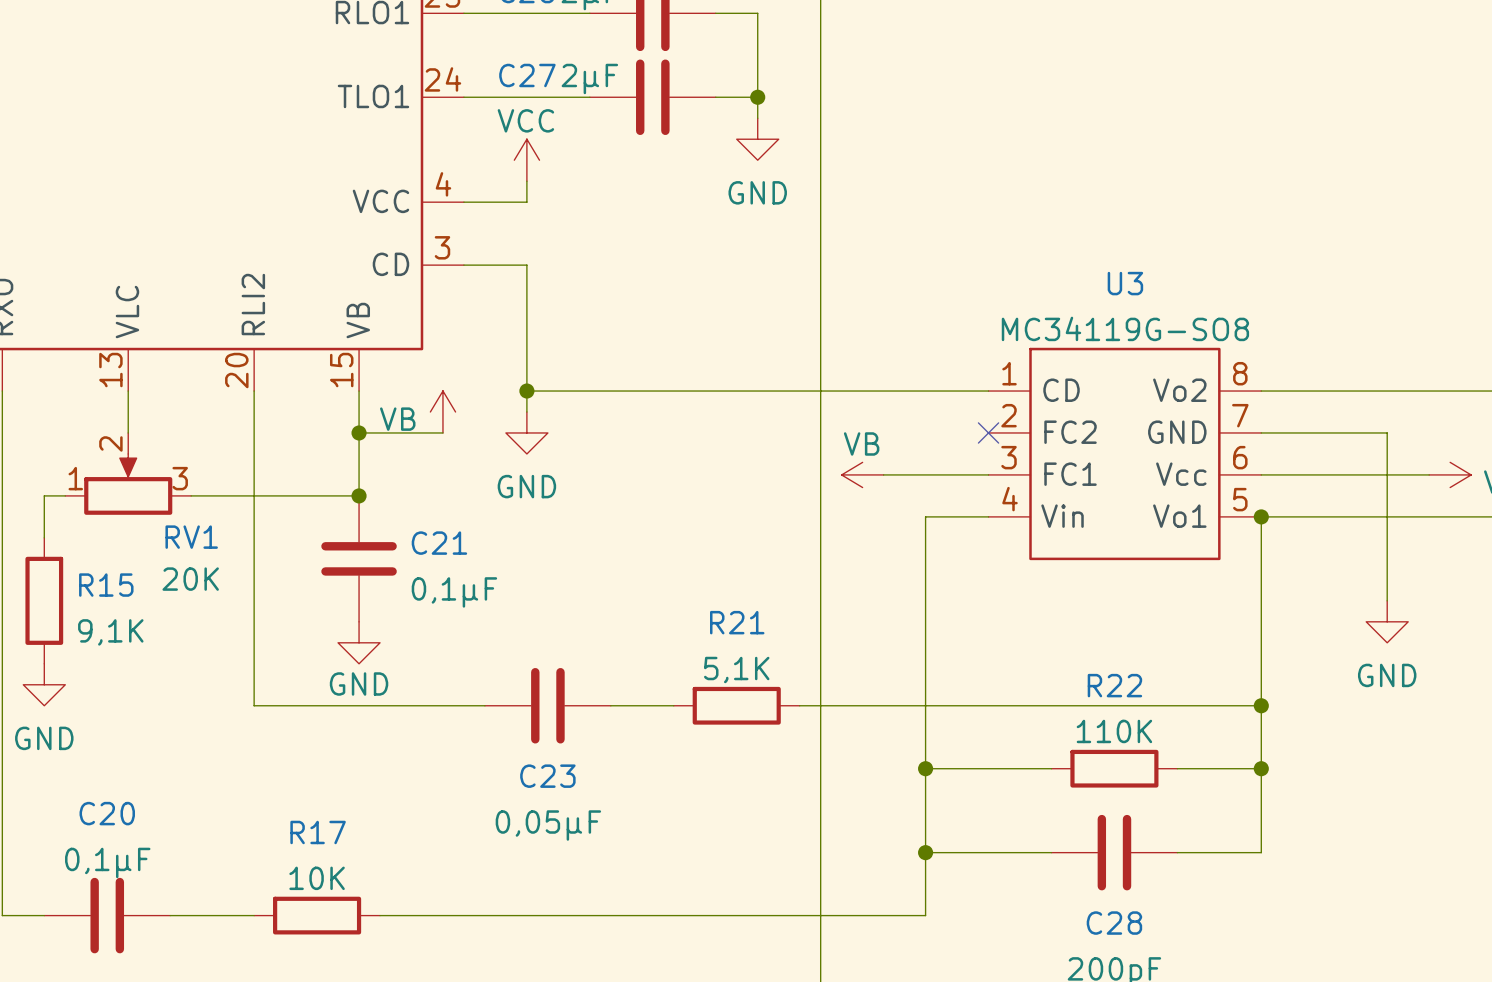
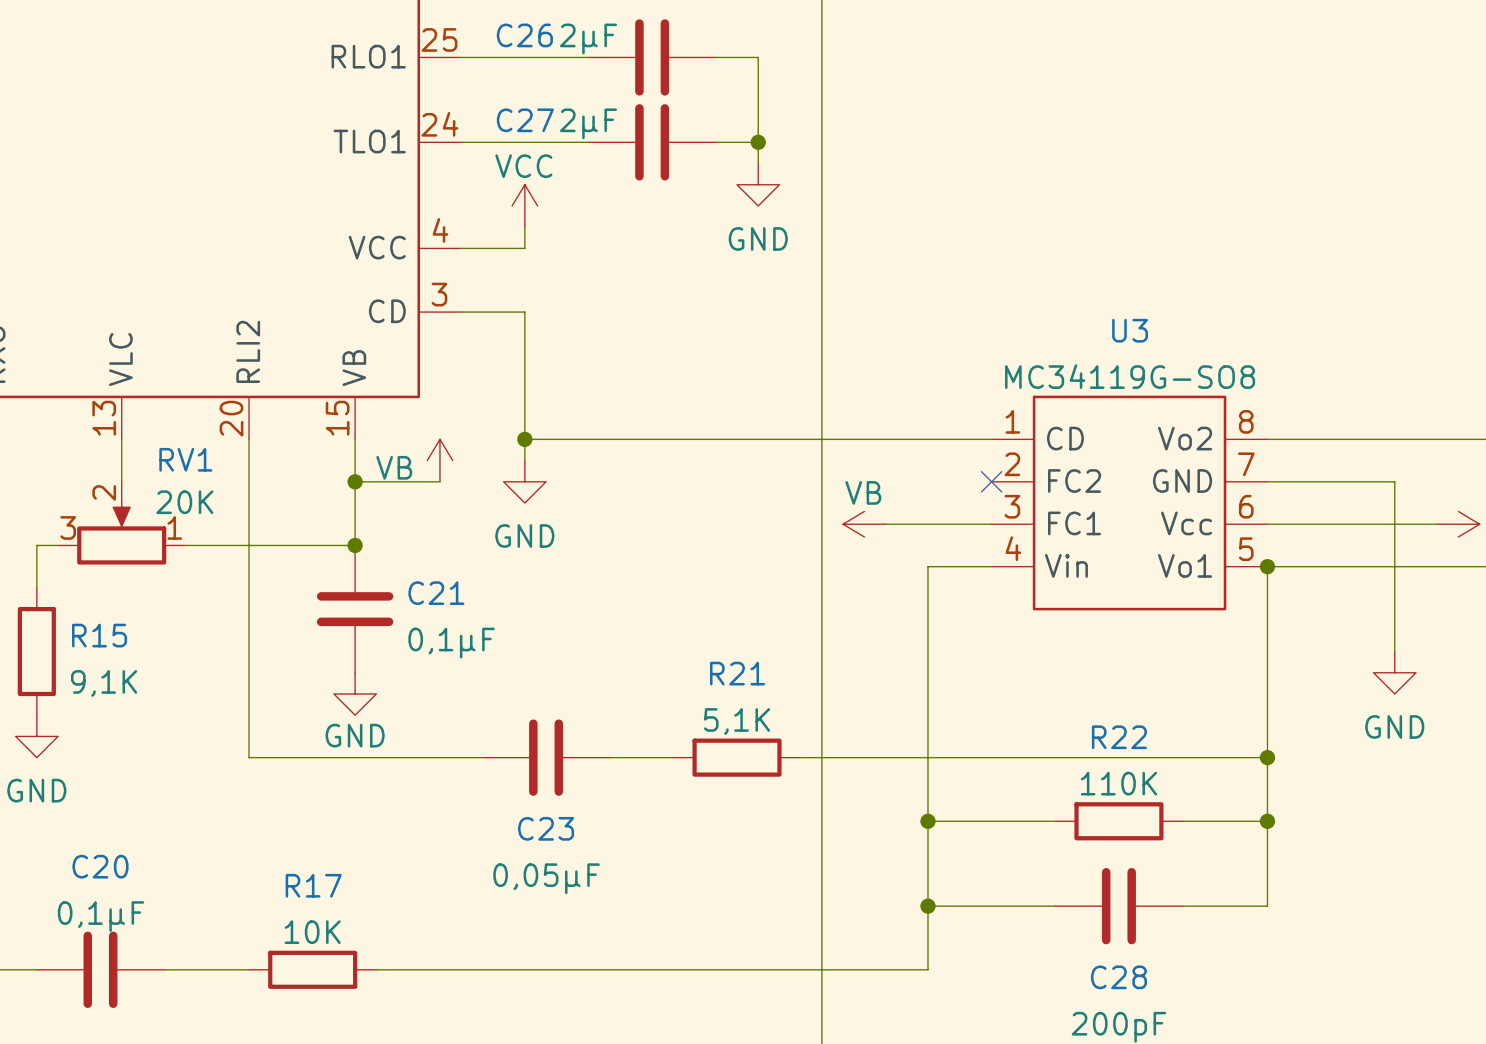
RV1 flip: as is (128, 484) -> left-right (121, 533)
RV1 name position: RV1 (191, 537) -> RV1 (185, 459)
RV1 value position: 20K (190, 579) -> 20K (184, 502)

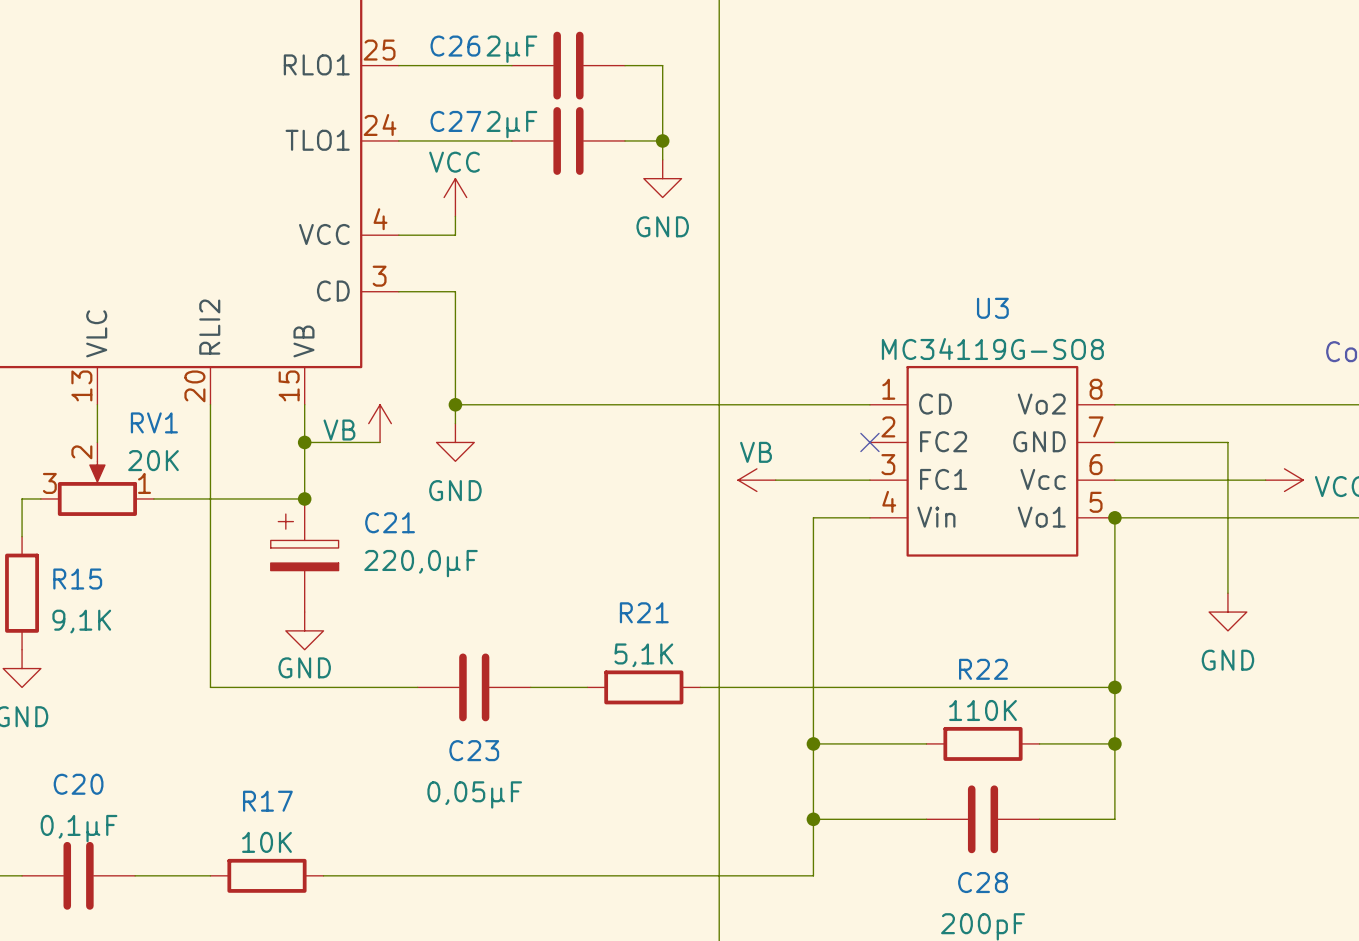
C21 symbol: [316, 545, 394, 673] -> [270, 498, 339, 613]
C21 value: 0,1µF (451, 643) -> 220,0µF (421, 563)

